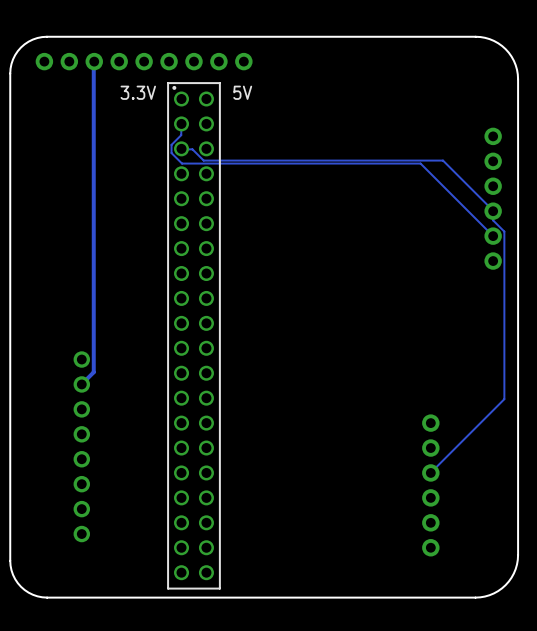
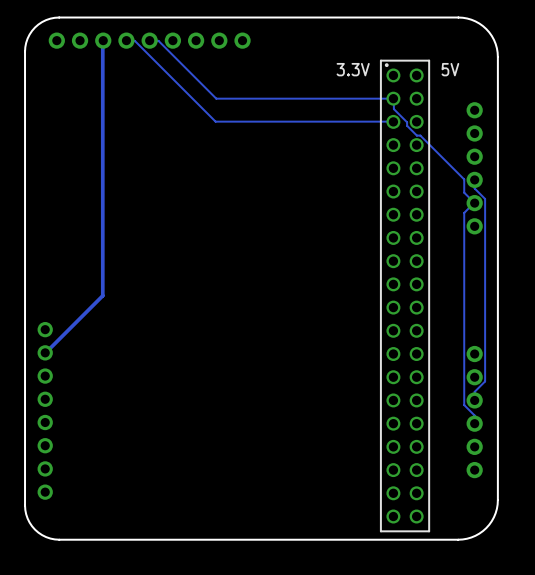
track: none -> (126, 40) (134, 40) (215, 121) (393, 121)
text position: 3.3V (138, 92) -> 3.3V (353, 69)
text position: 5V (242, 92) -> 5V (450, 69)
track: (181, 123) (181, 135) (171, 144) (171, 153) (182, 163) (420, 163) (481, 224) -> (149, 40) (158, 40) (216, 98) (393, 98) (393, 109) (407, 122) (407, 125) (416, 135) (420, 135) (464, 179) (464, 192)
track: (181, 148) (192, 149) (203, 160) (443, 160) (493, 211) -> none
track: none -> (474, 203) (464, 212) (464, 405) (474, 415) (474, 423)
track: (93, 335) (93, 372) (81, 384) -> (102, 295) (45, 352)
part position: (193, 335) -> (405, 295)
track: (504, 399) (430, 472) -> (485, 354) (485, 381) (474, 391) (474, 400)
part position: (81, 446) -> (45, 410)
part position: (430, 485) -> (474, 412)

